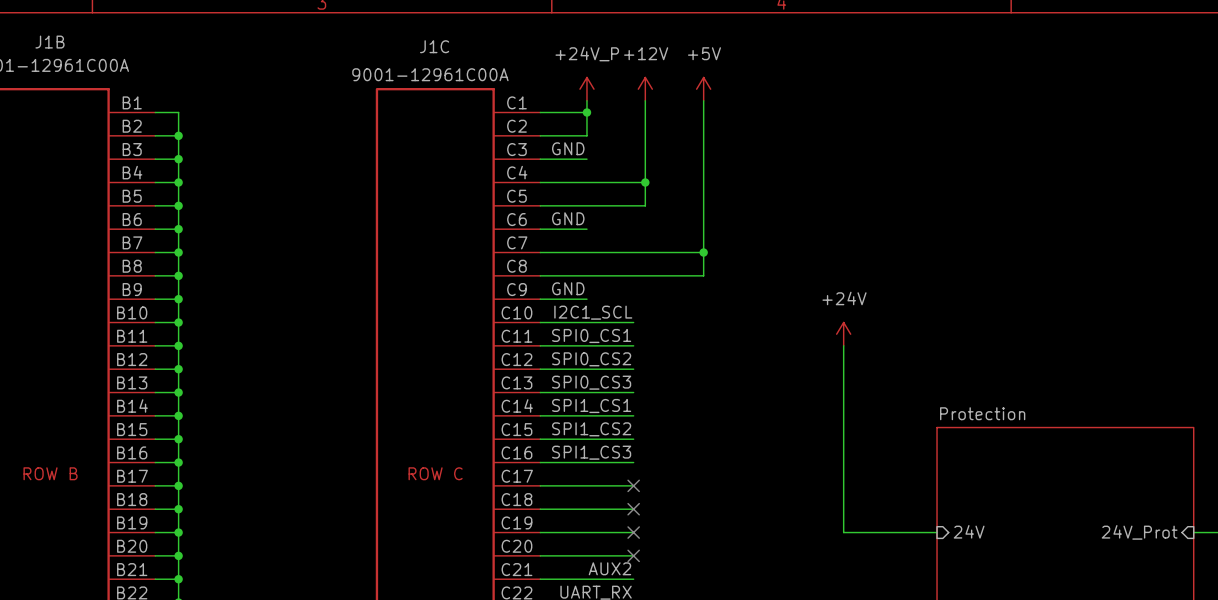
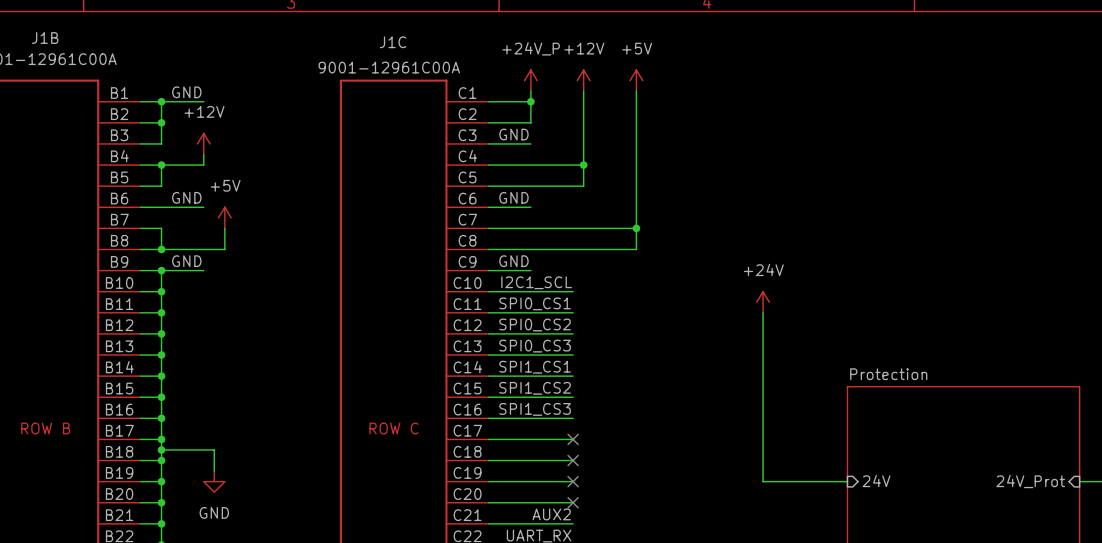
label: none -> GND (186, 92)
wire: none -> (161, 101) (203, 101)
junction: none -> (161, 101)
wire: (178, 159) (178, 182) -> (203, 154) (203, 165) (161, 165)
junction: (178, 159) -> none
power symbol: none -> +12V (203, 143)
wire: (178, 205) (178, 252) -> none
junction: (178, 205) -> none
label: none -> GND (186, 197)
wire: none -> (161, 207) (203, 207)
junction: (178, 229) -> none
power symbol: none -> +5V (224, 217)
junction: (178, 252) -> none
wire: none -> (224, 228) (224, 249) (161, 249)
wire: (178, 275) (178, 299) -> (203, 270) (161, 270)
label: none -> GND (186, 261)
wire: none -> (161, 449) (214, 449) (214, 471)
junction: none -> (161, 449)
power symbol: none -> GND (214, 481)

